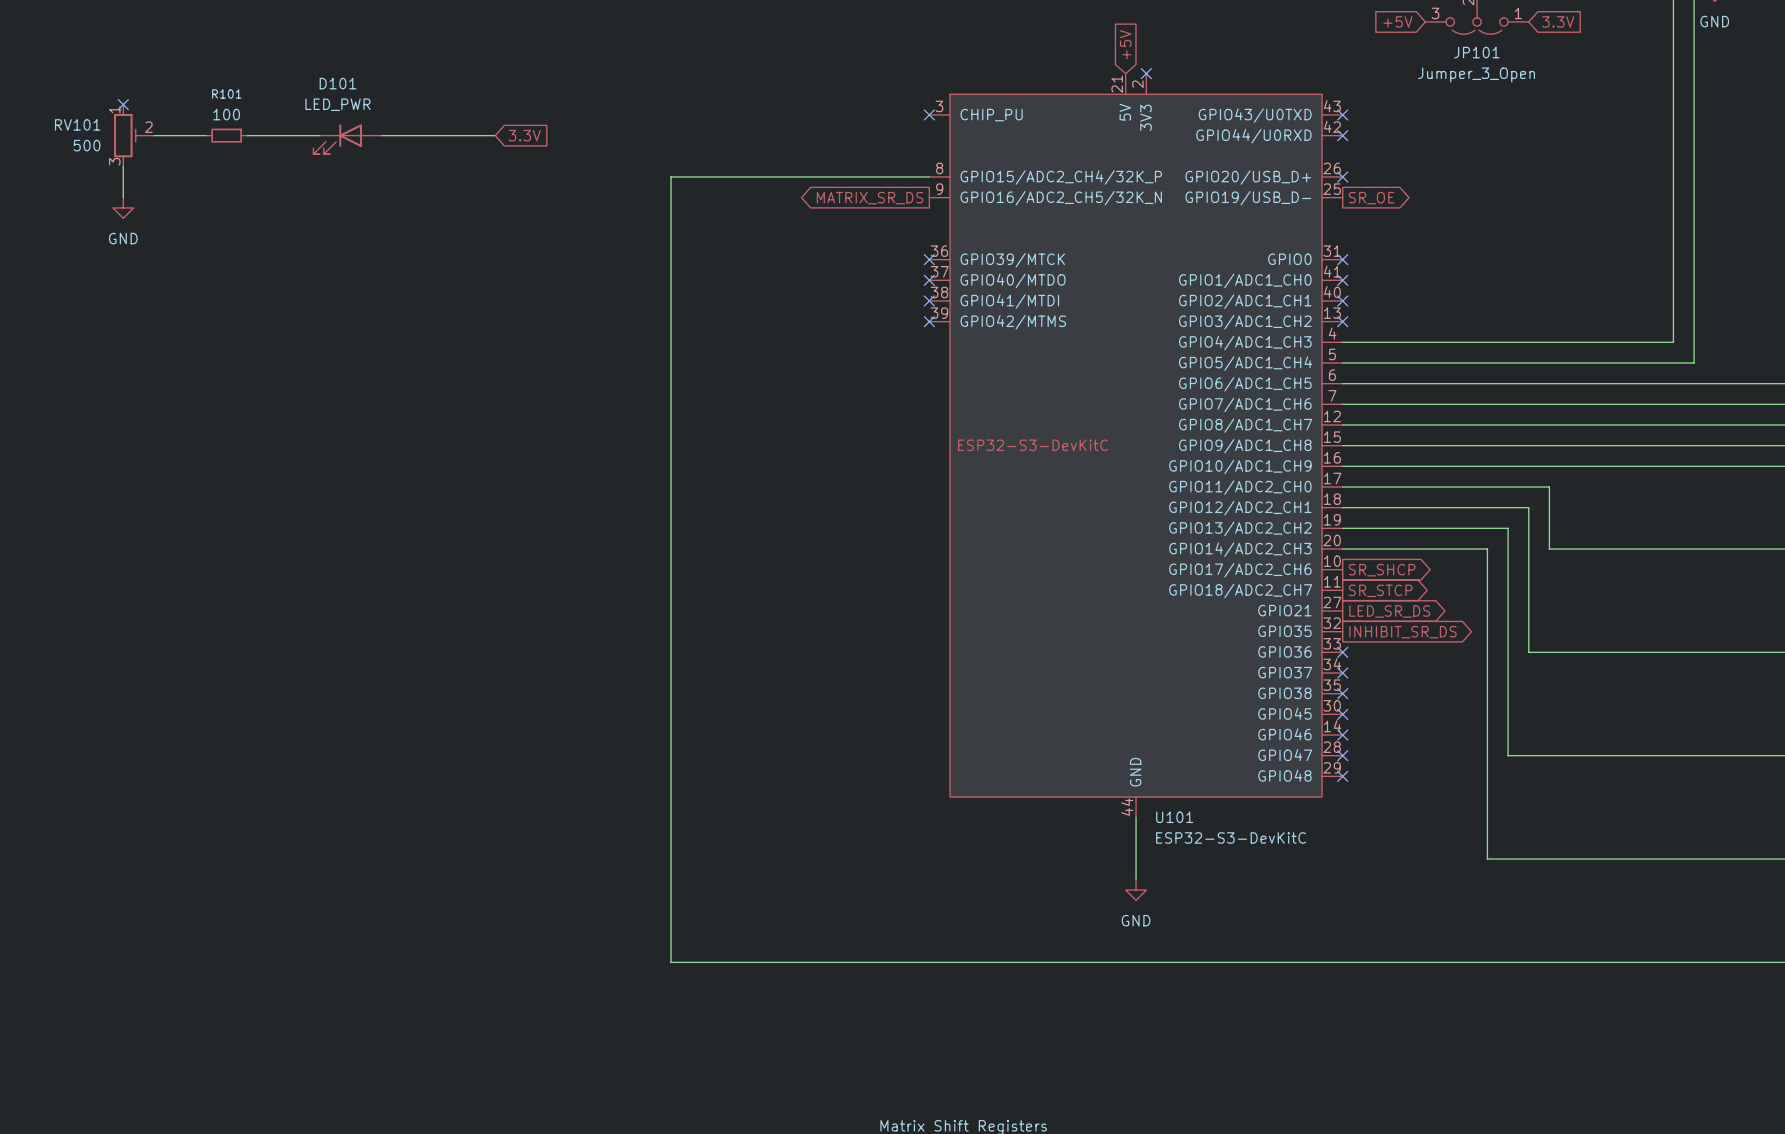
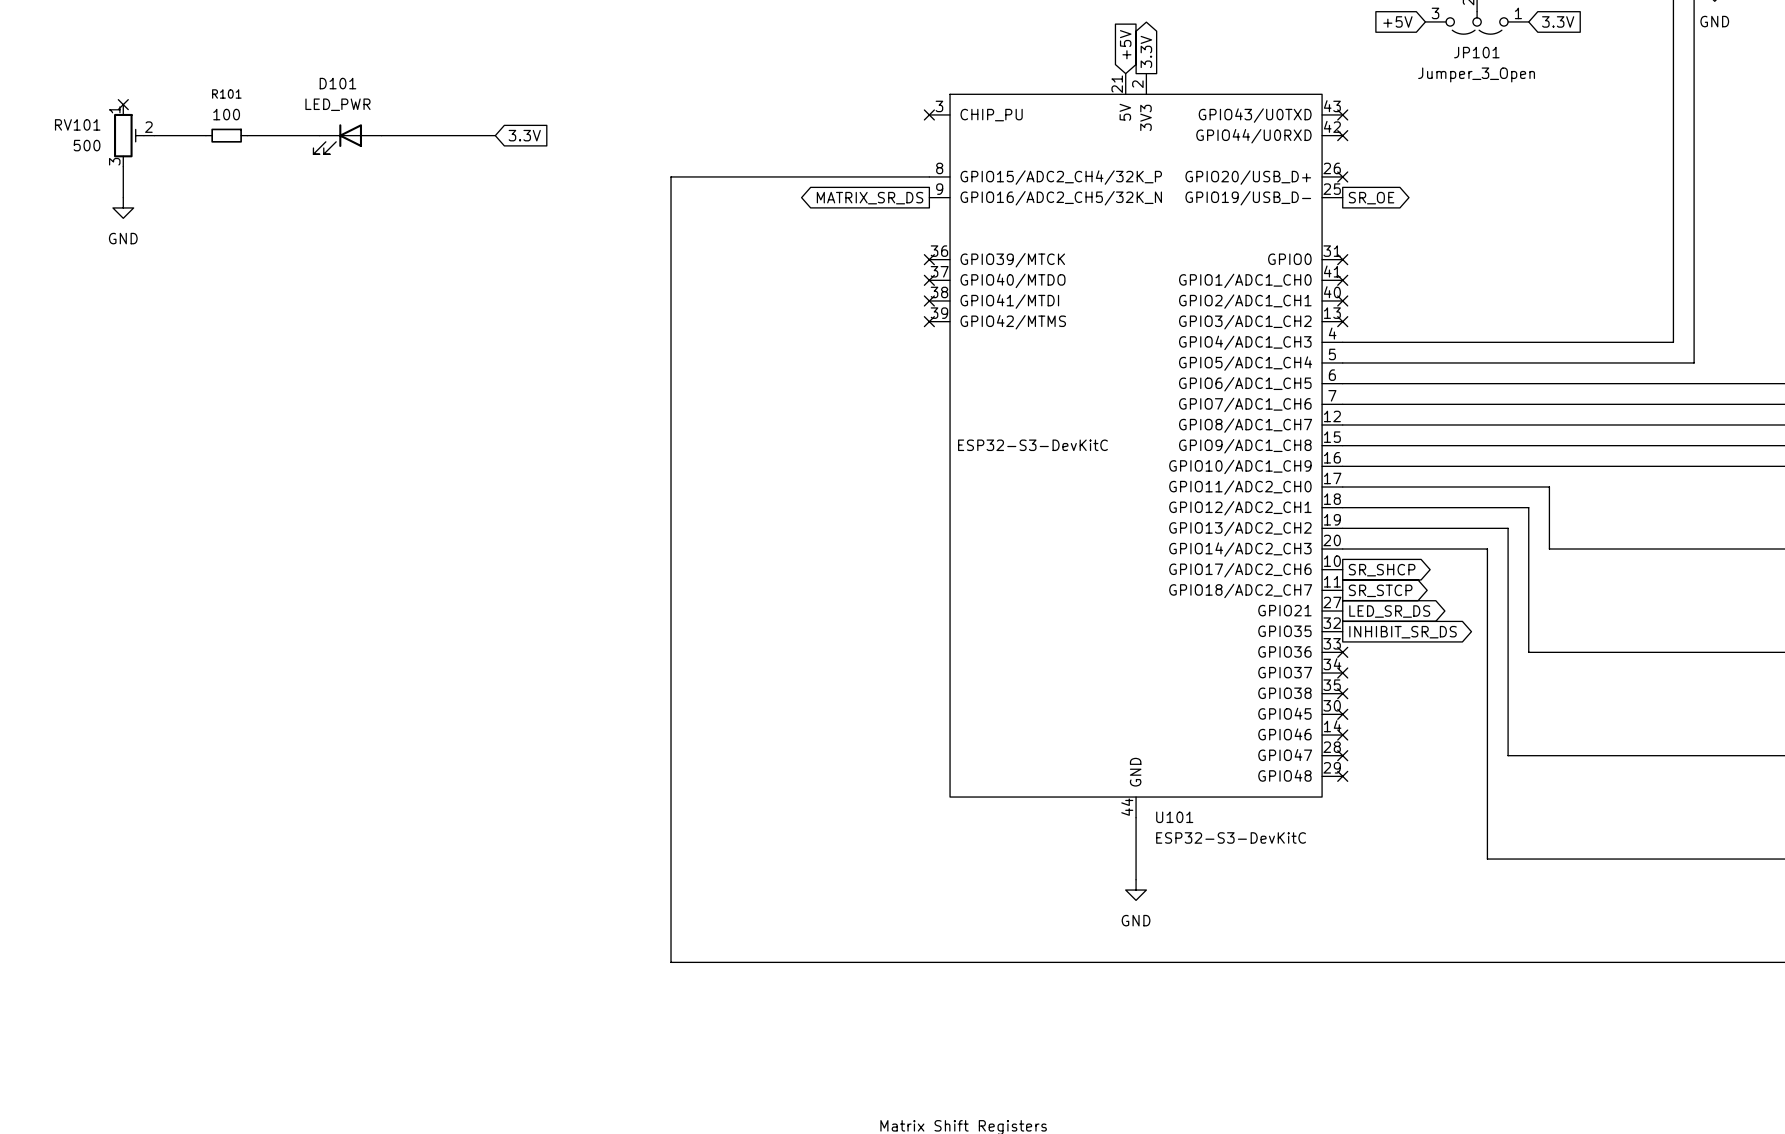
global label: none -> 3.3V (1146, 51)
no-connect mark: (1146, 73) -> none

